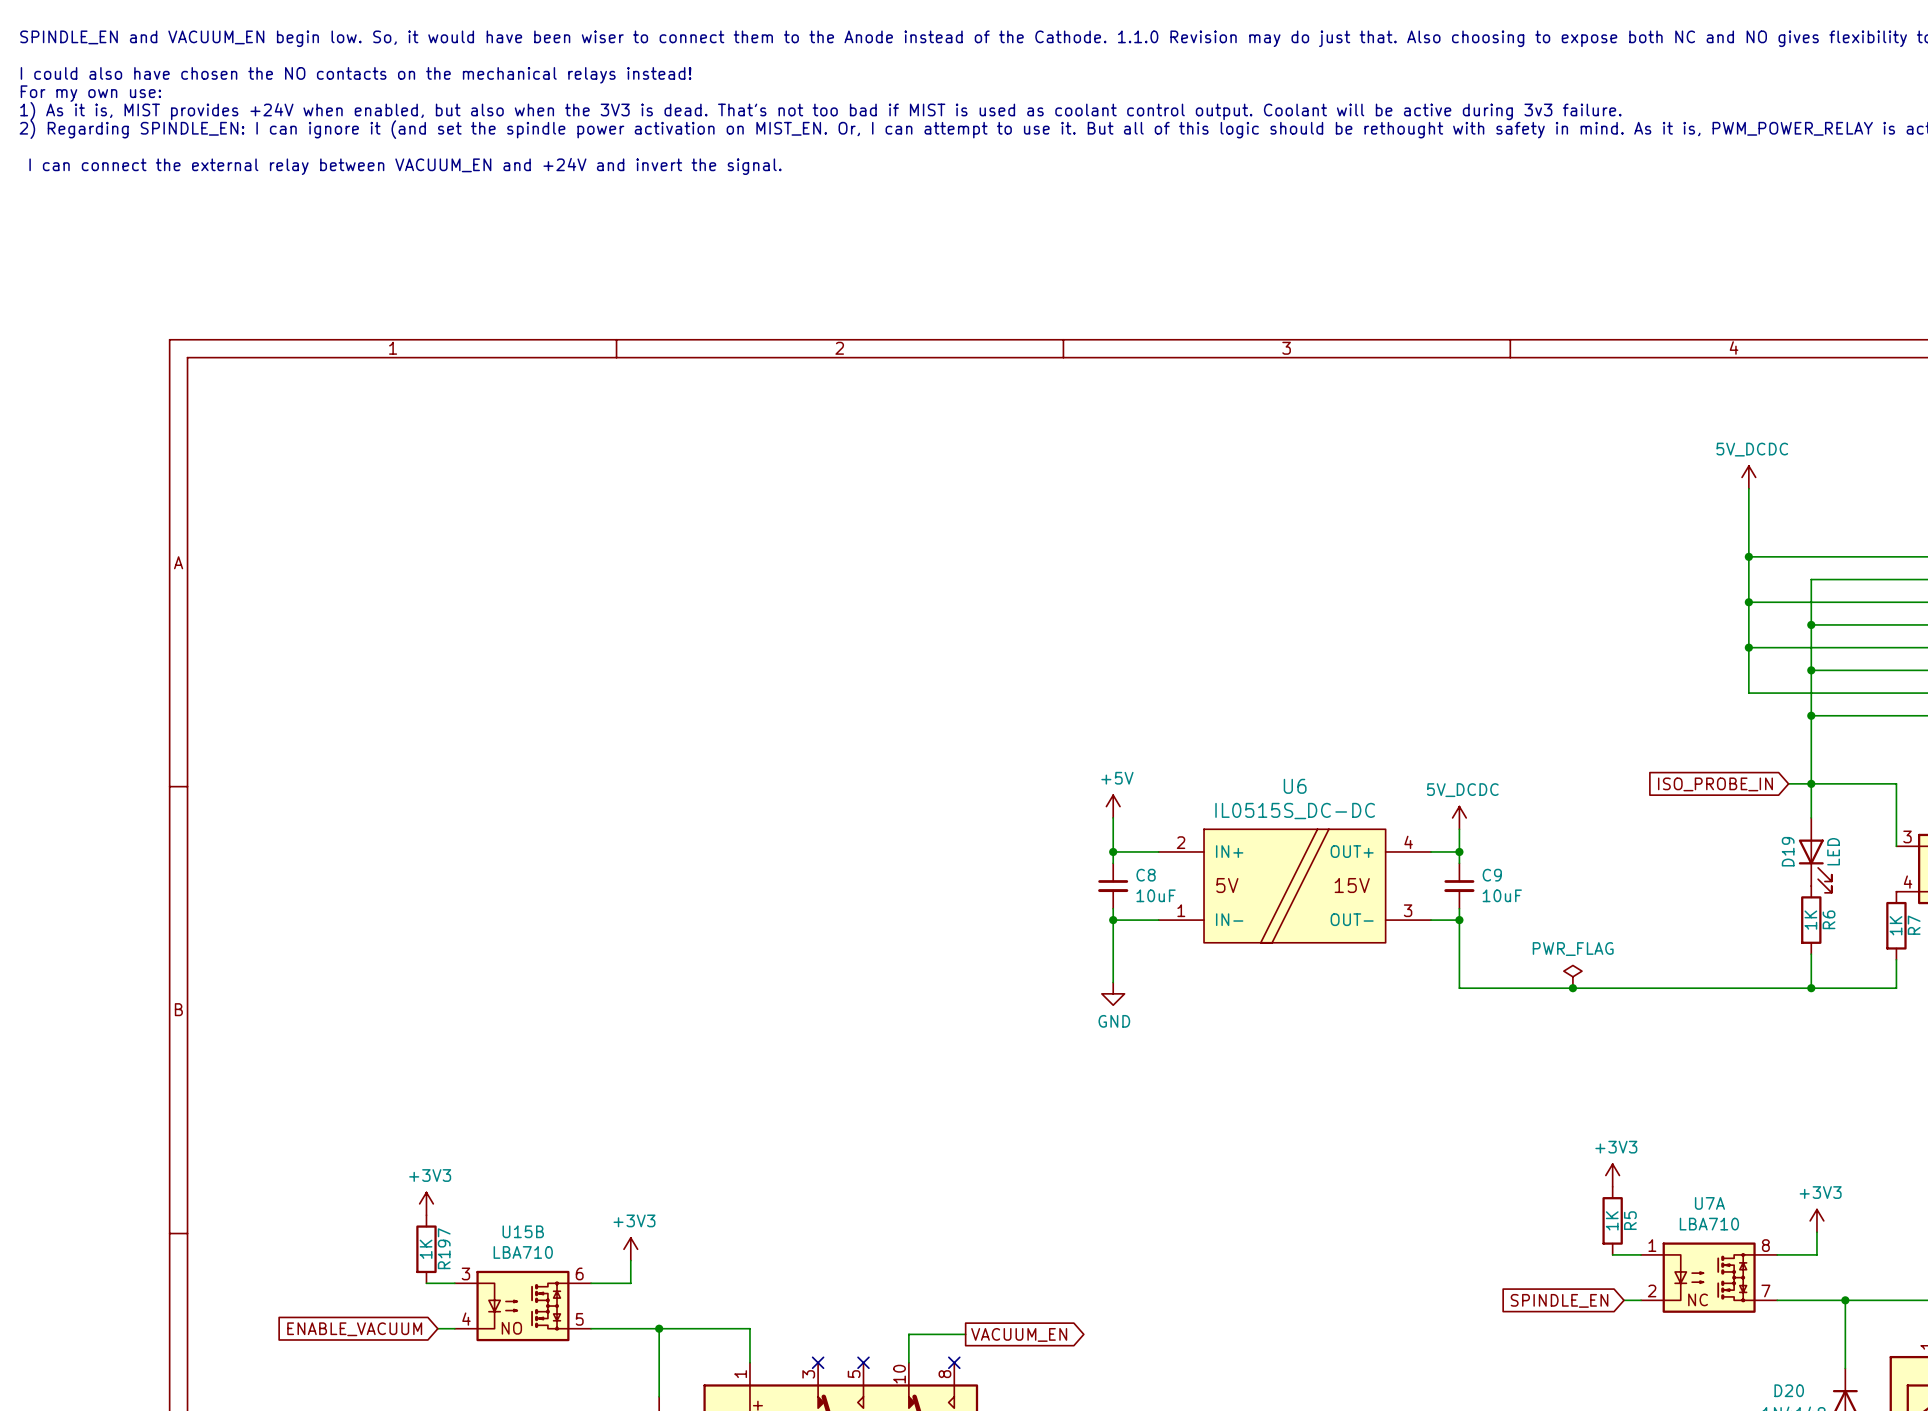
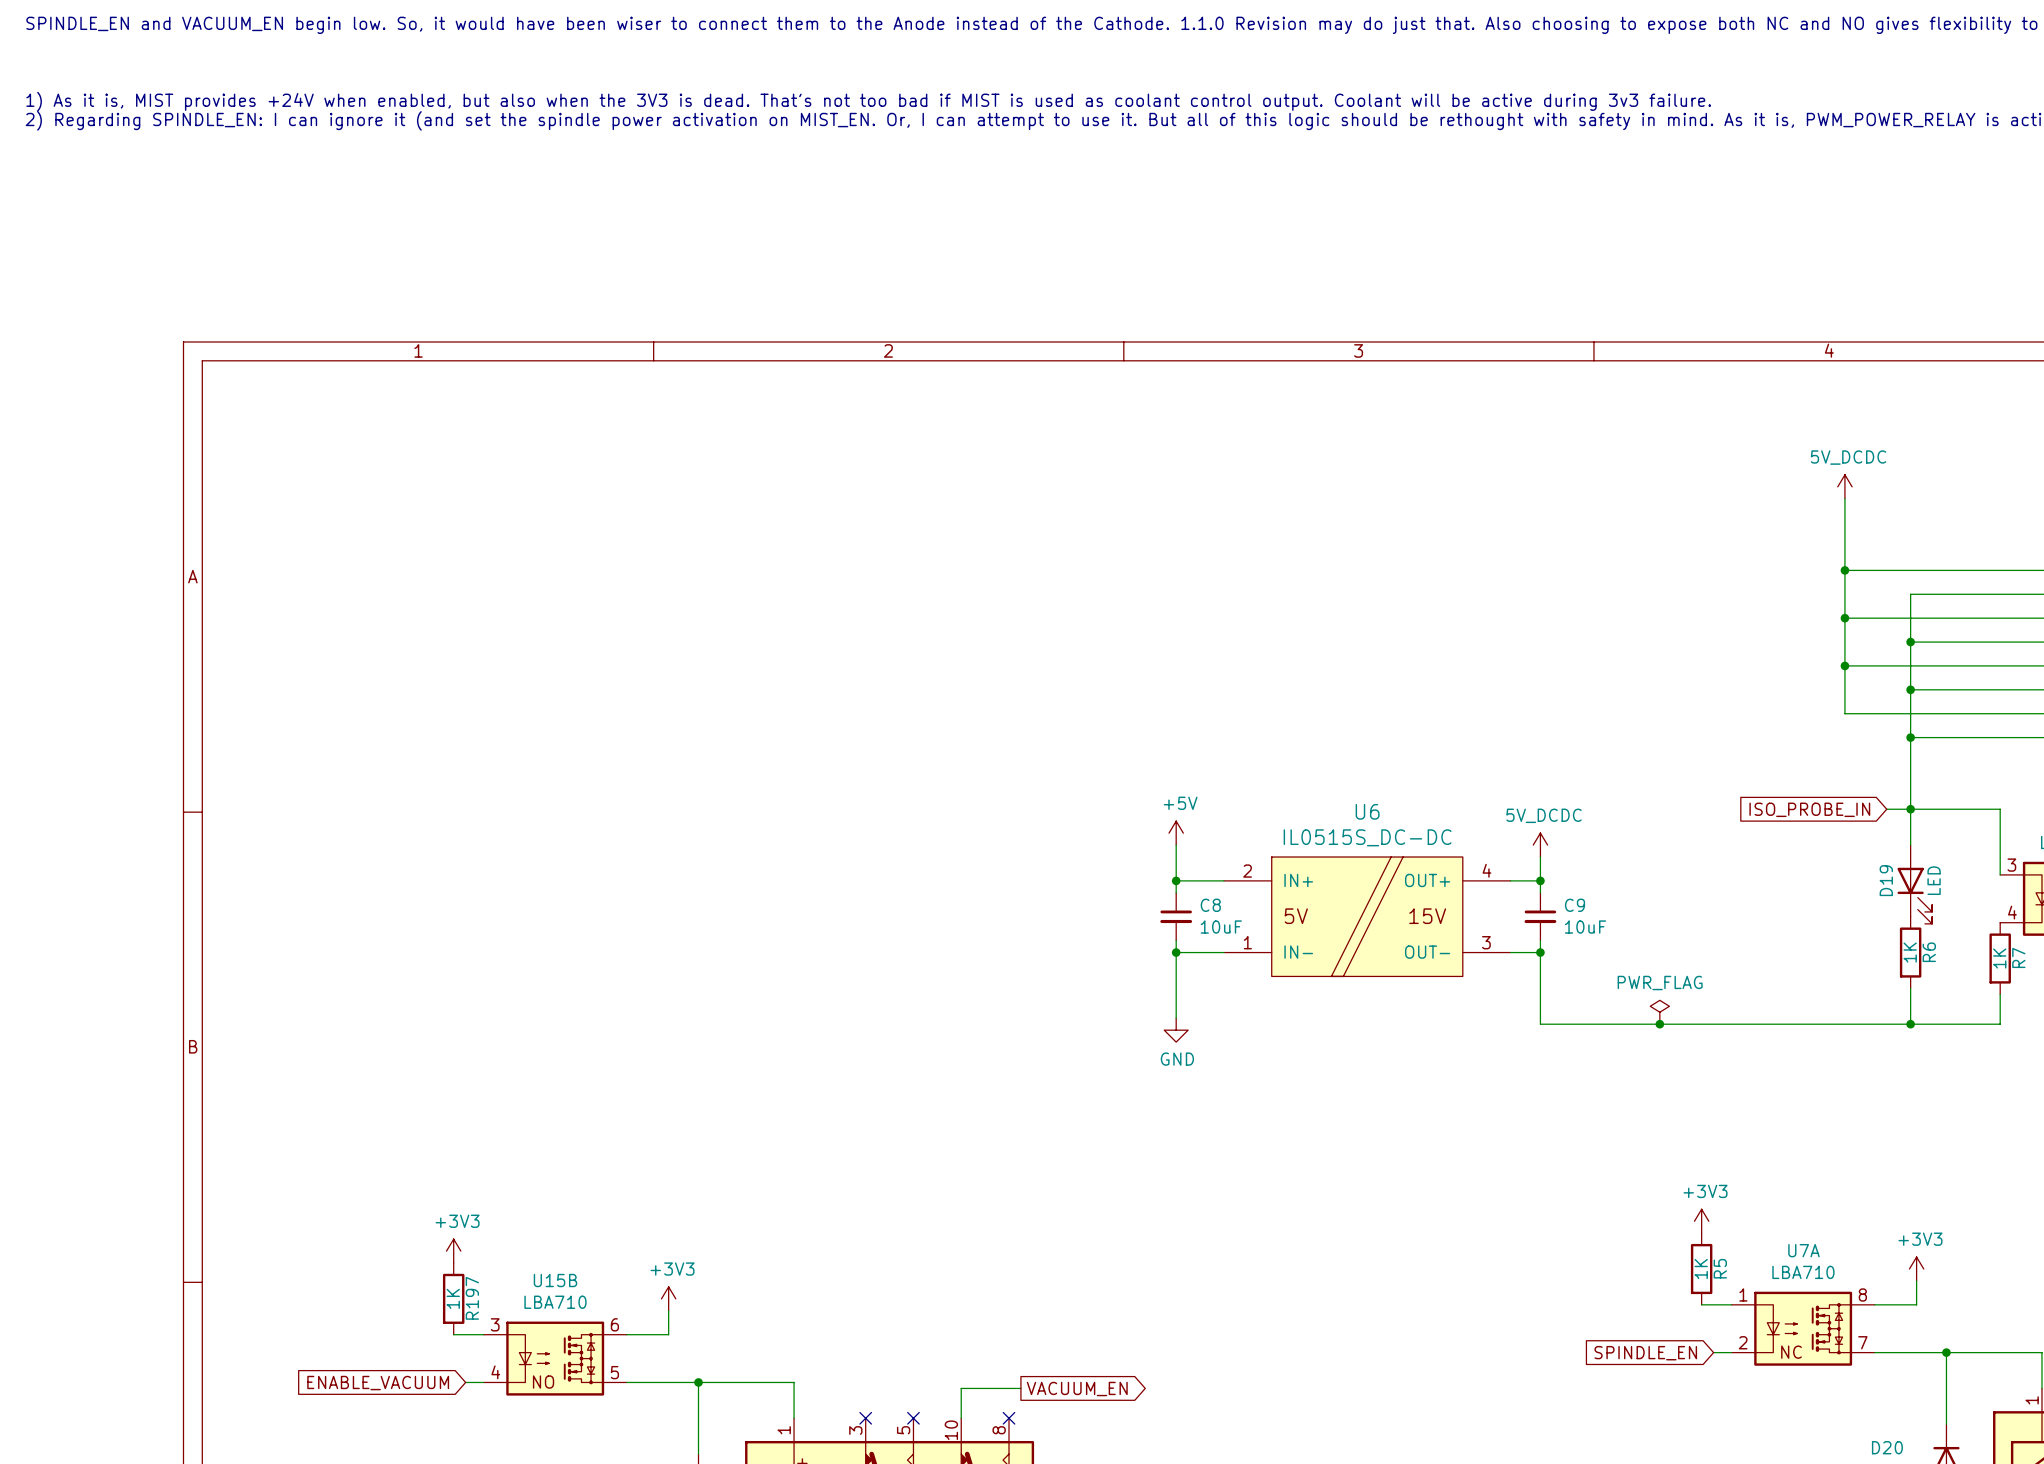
text: I could also have chosen the NO contacts on the mechanical relays instead! (356, 75) -> none
text: For my own use: (90, 93) -> none
text: I can connect the external relay between VACUUM_EN and +24V and invert the signal. (405, 166) -> none

